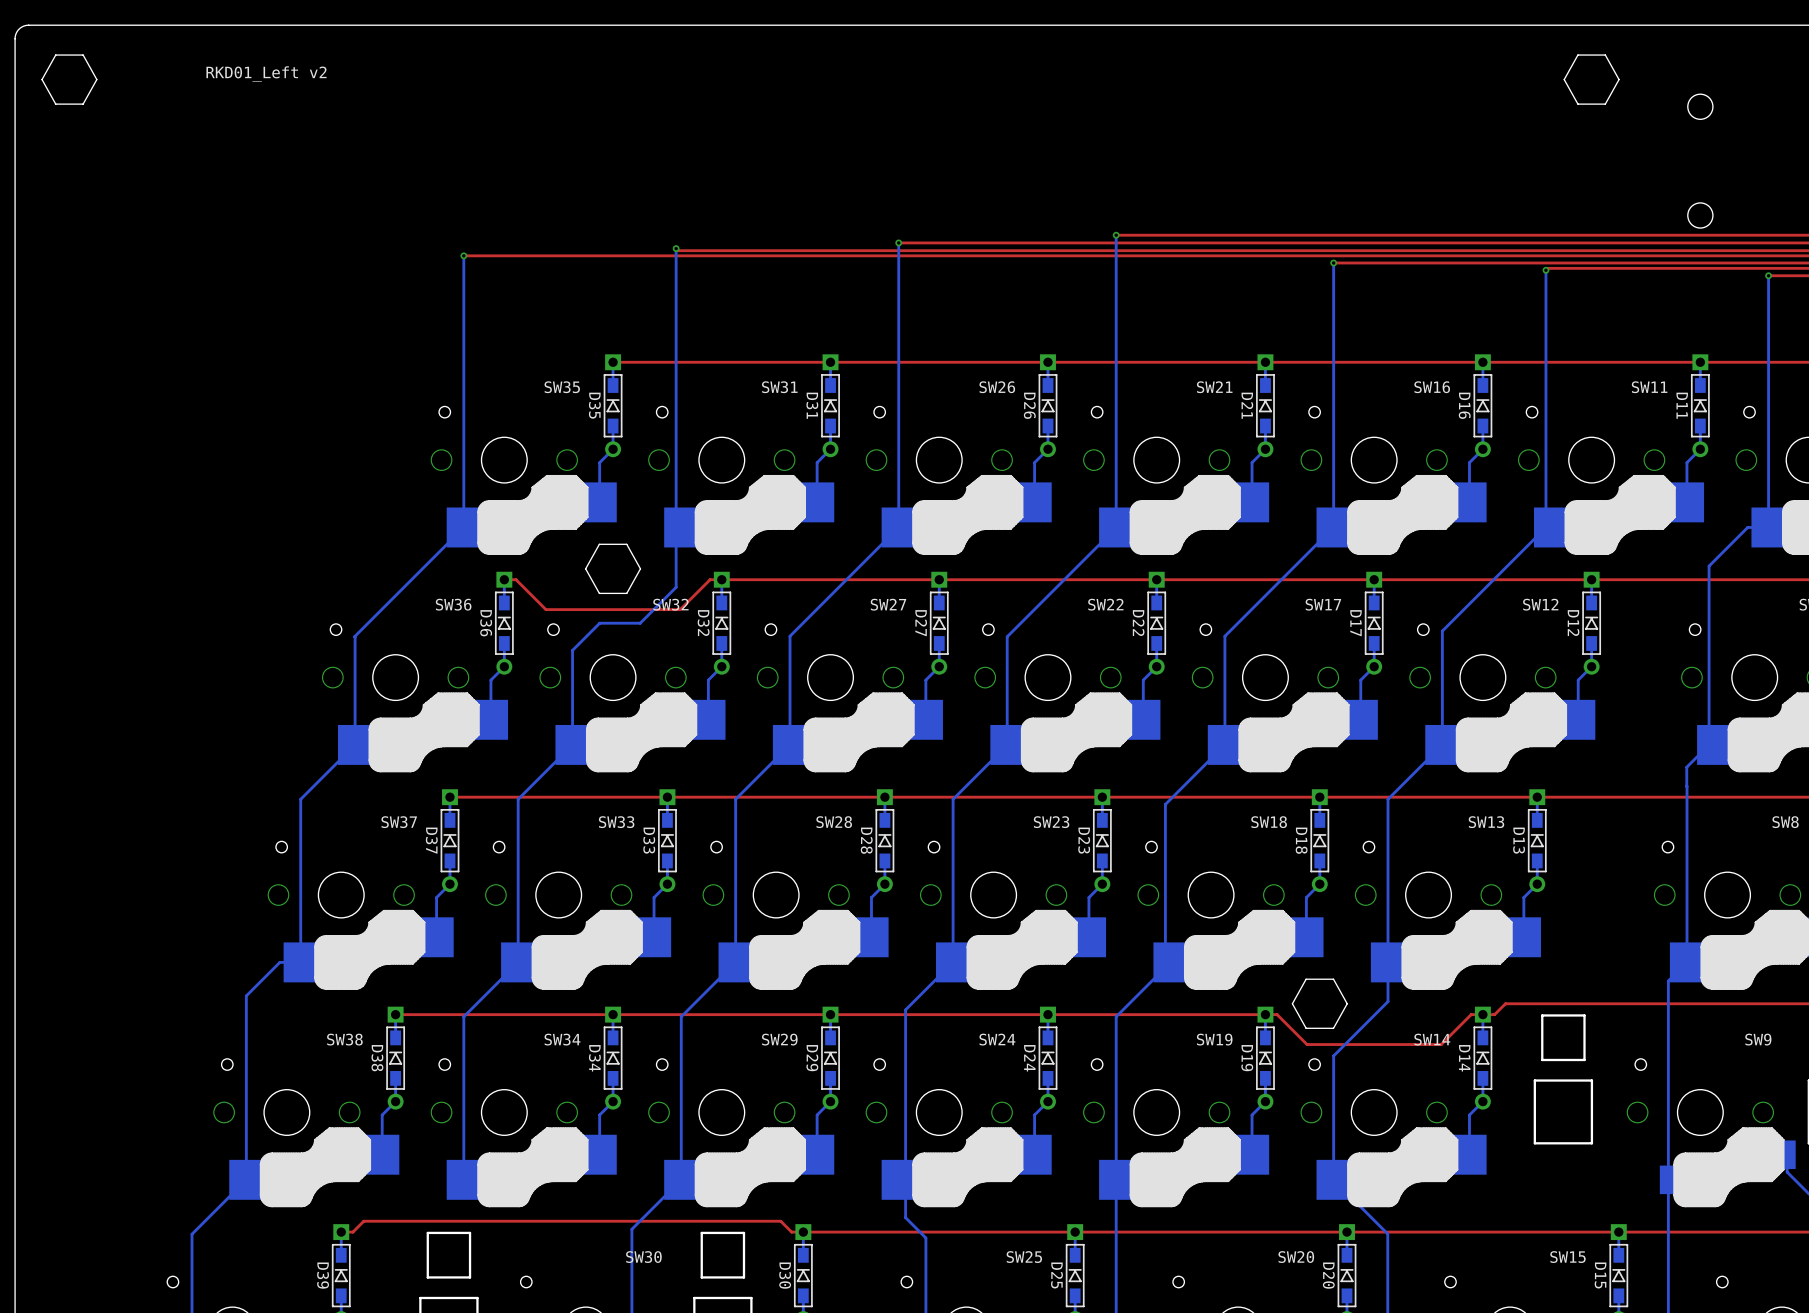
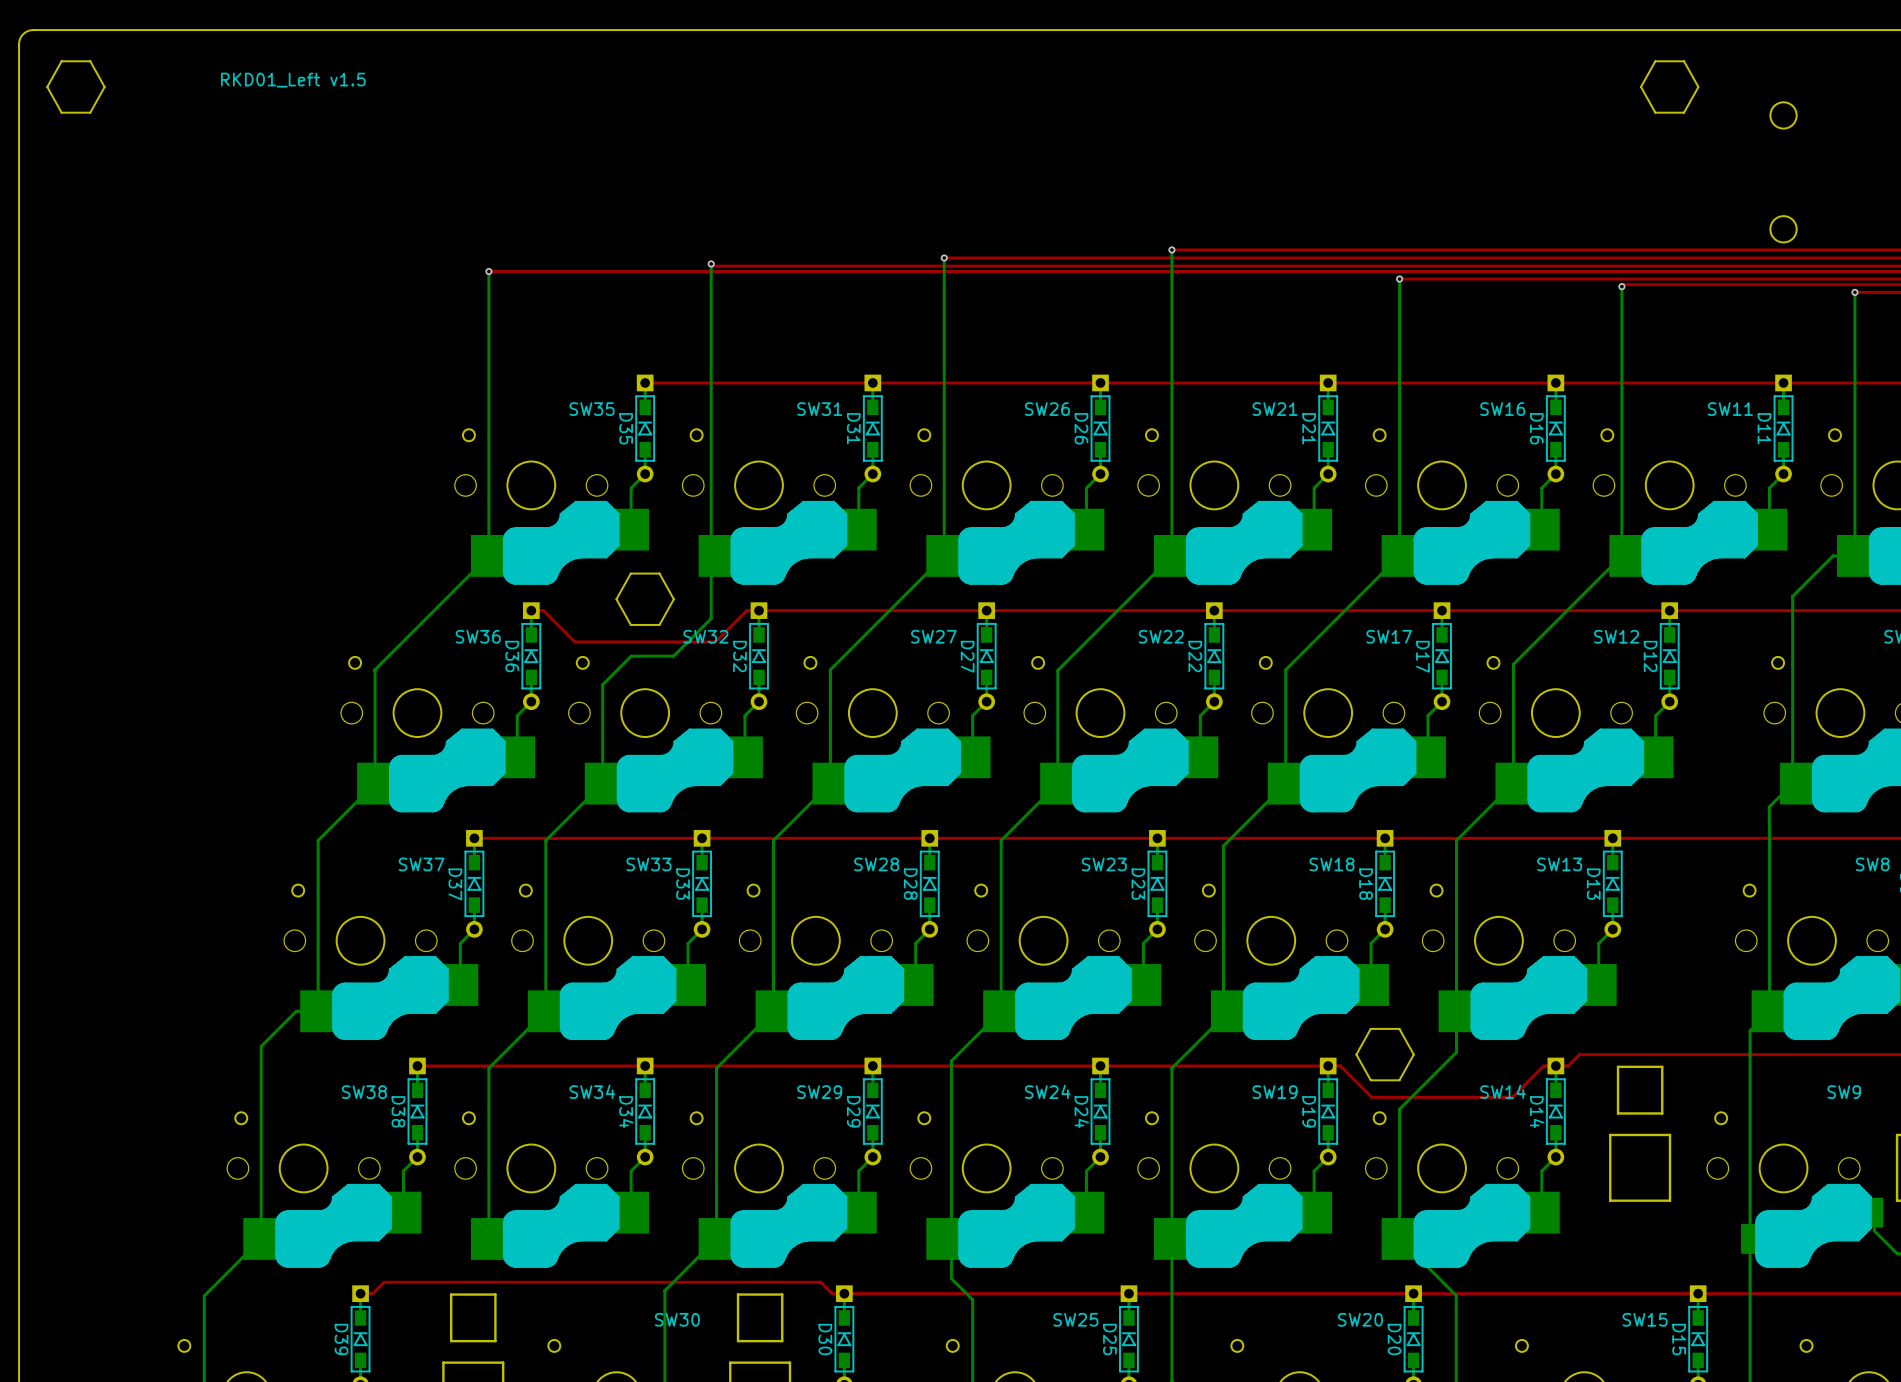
text: RKD01_Left v2 (266, 74) -> RKD01_Left v1.5 (293, 80)

